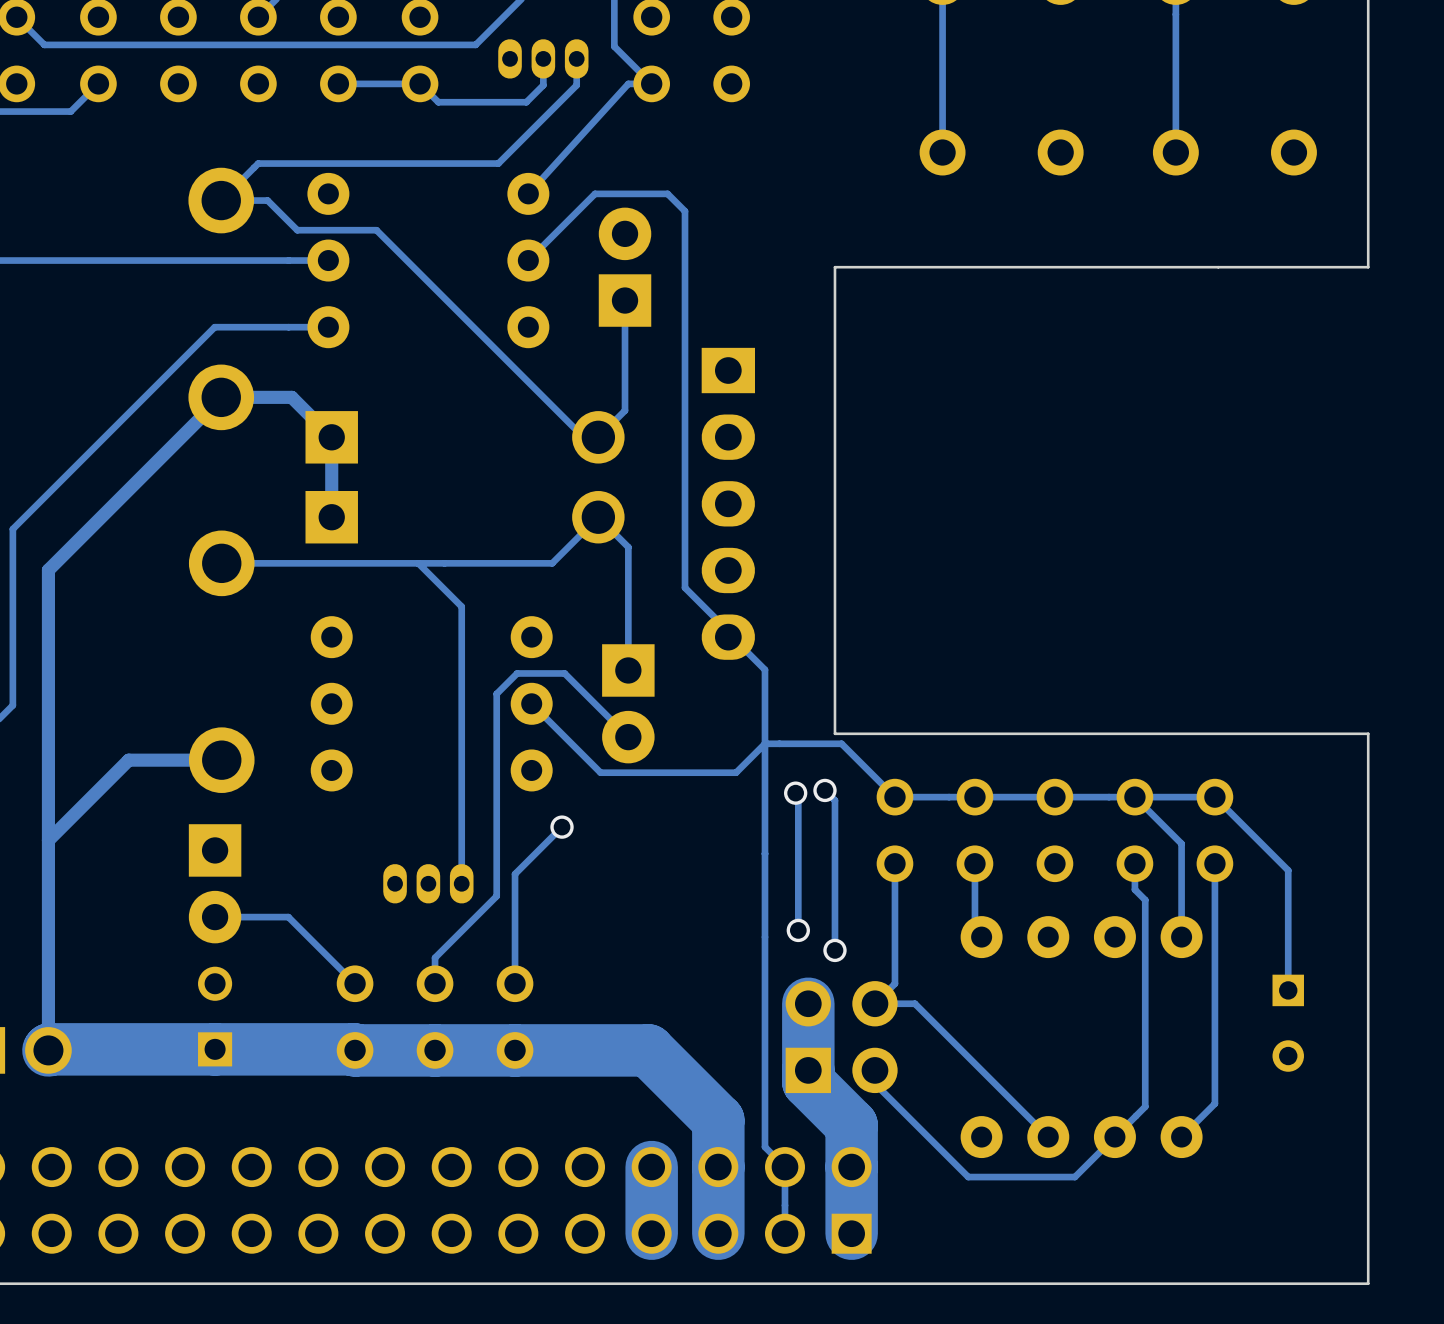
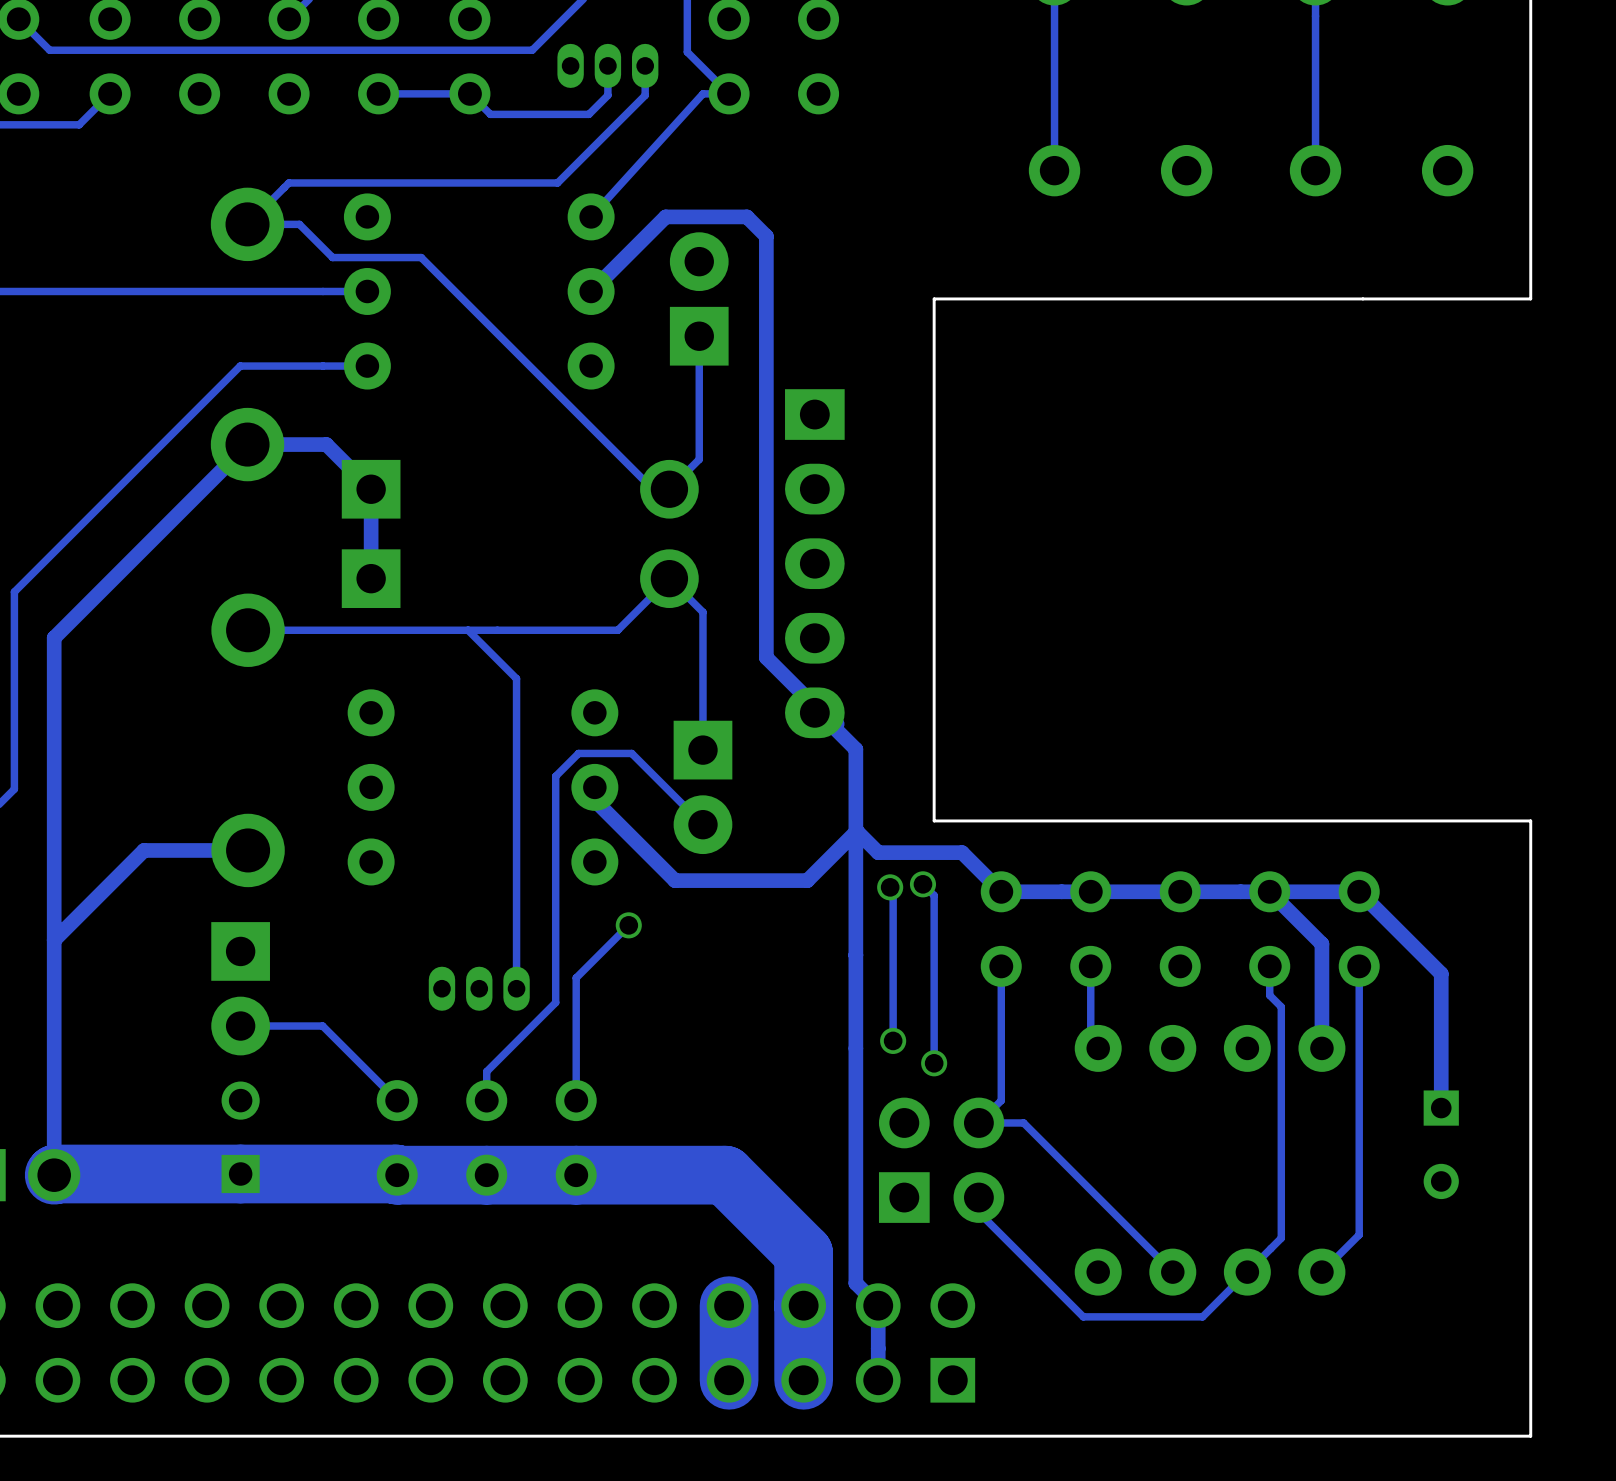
track width: thin (528, 260) (595, 193) (667, 193) (685, 211) (685, 587) (744, 647) (748, 647) -> thick (591, 291) (665, 216) (746, 216) (766, 236) (766, 657) (832, 724) (837, 724)
track width: thin (728, 637) (732, 637) (764, 669) (764, 1147) (784, 1167) (784, 1233) -> thick (814, 712) (819, 712) (855, 749) (855, 1283) (878, 1305) (878, 1380)
track: (531, 703) (600, 772) (736, 772) -> (594, 787) (594, 800) (675, 880) (807, 880) (823, 864)
track: (766, 743) (841, 743) (859, 762) -> (857, 832) (878, 852) (962, 852)
track width: thin (766, 743) (736, 772) -> thick (857, 832) (823, 864)
track width: thin (859, 762) (894, 797) (1214, 797) (1288, 870) (1288, 990) -> thick (962, 852) (1001, 891) (1359, 891) (1441, 973) (1441, 1108)
track width: thin (1134, 797) (1181, 843) (1181, 937) -> thick (1269, 891) (1321, 943) (1321, 1048)
track: (808, 1003) (808, 1081) (851, 1125) (851, 1233) -> none

